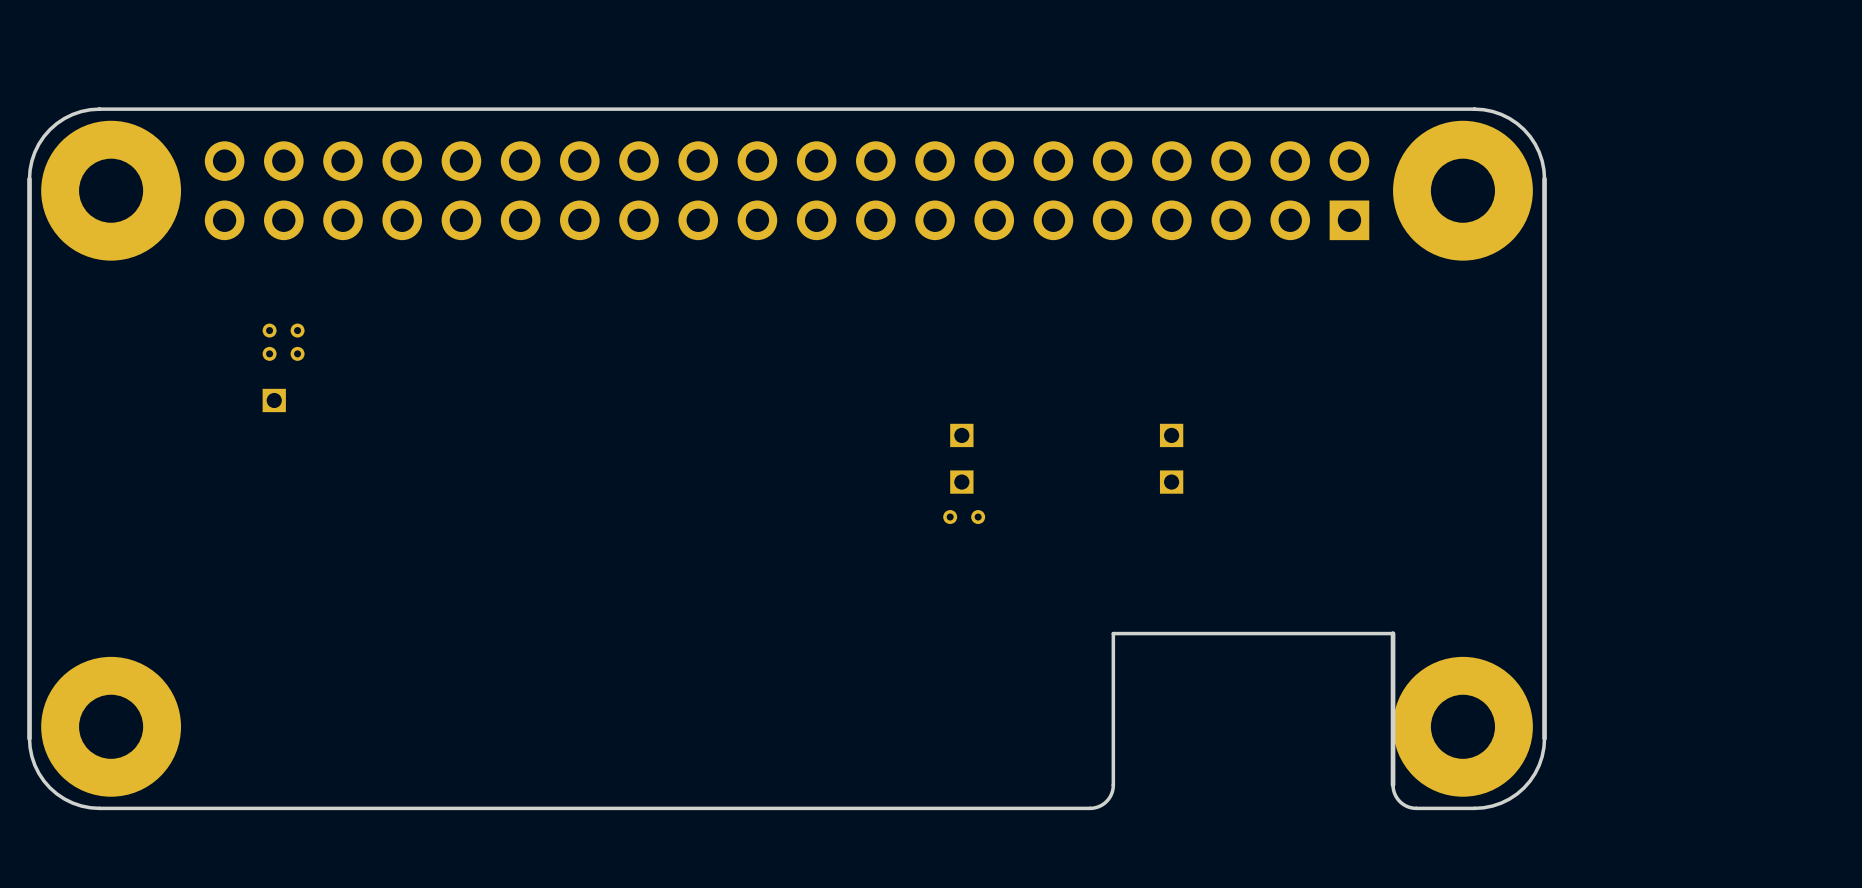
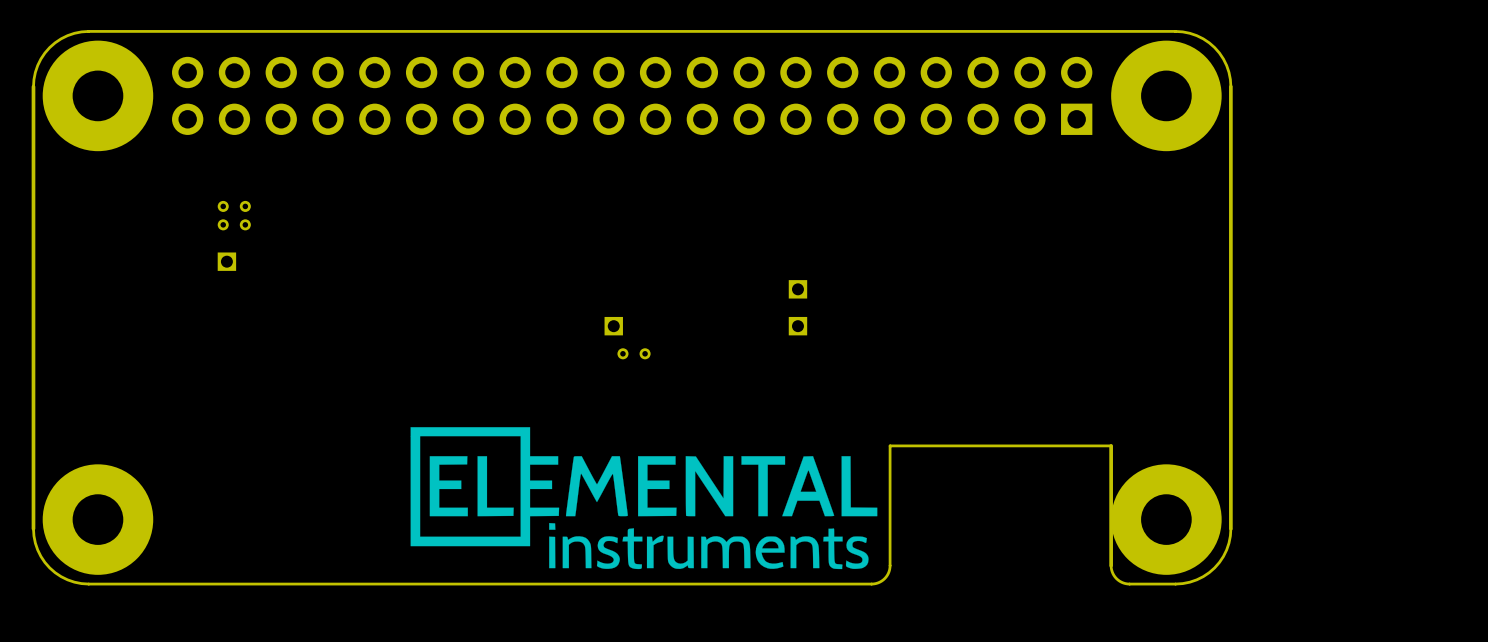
part: (961, 435) -> none
part: none -> (797, 289)
part: (1171, 435) -> none
part: none -> (613, 326)
part: (961, 482) -> none
part: none -> (797, 326)
part: (1171, 482) -> none
part position: (964, 517) -> (634, 353)
drawing: none -> [410, 427, 878, 570]

